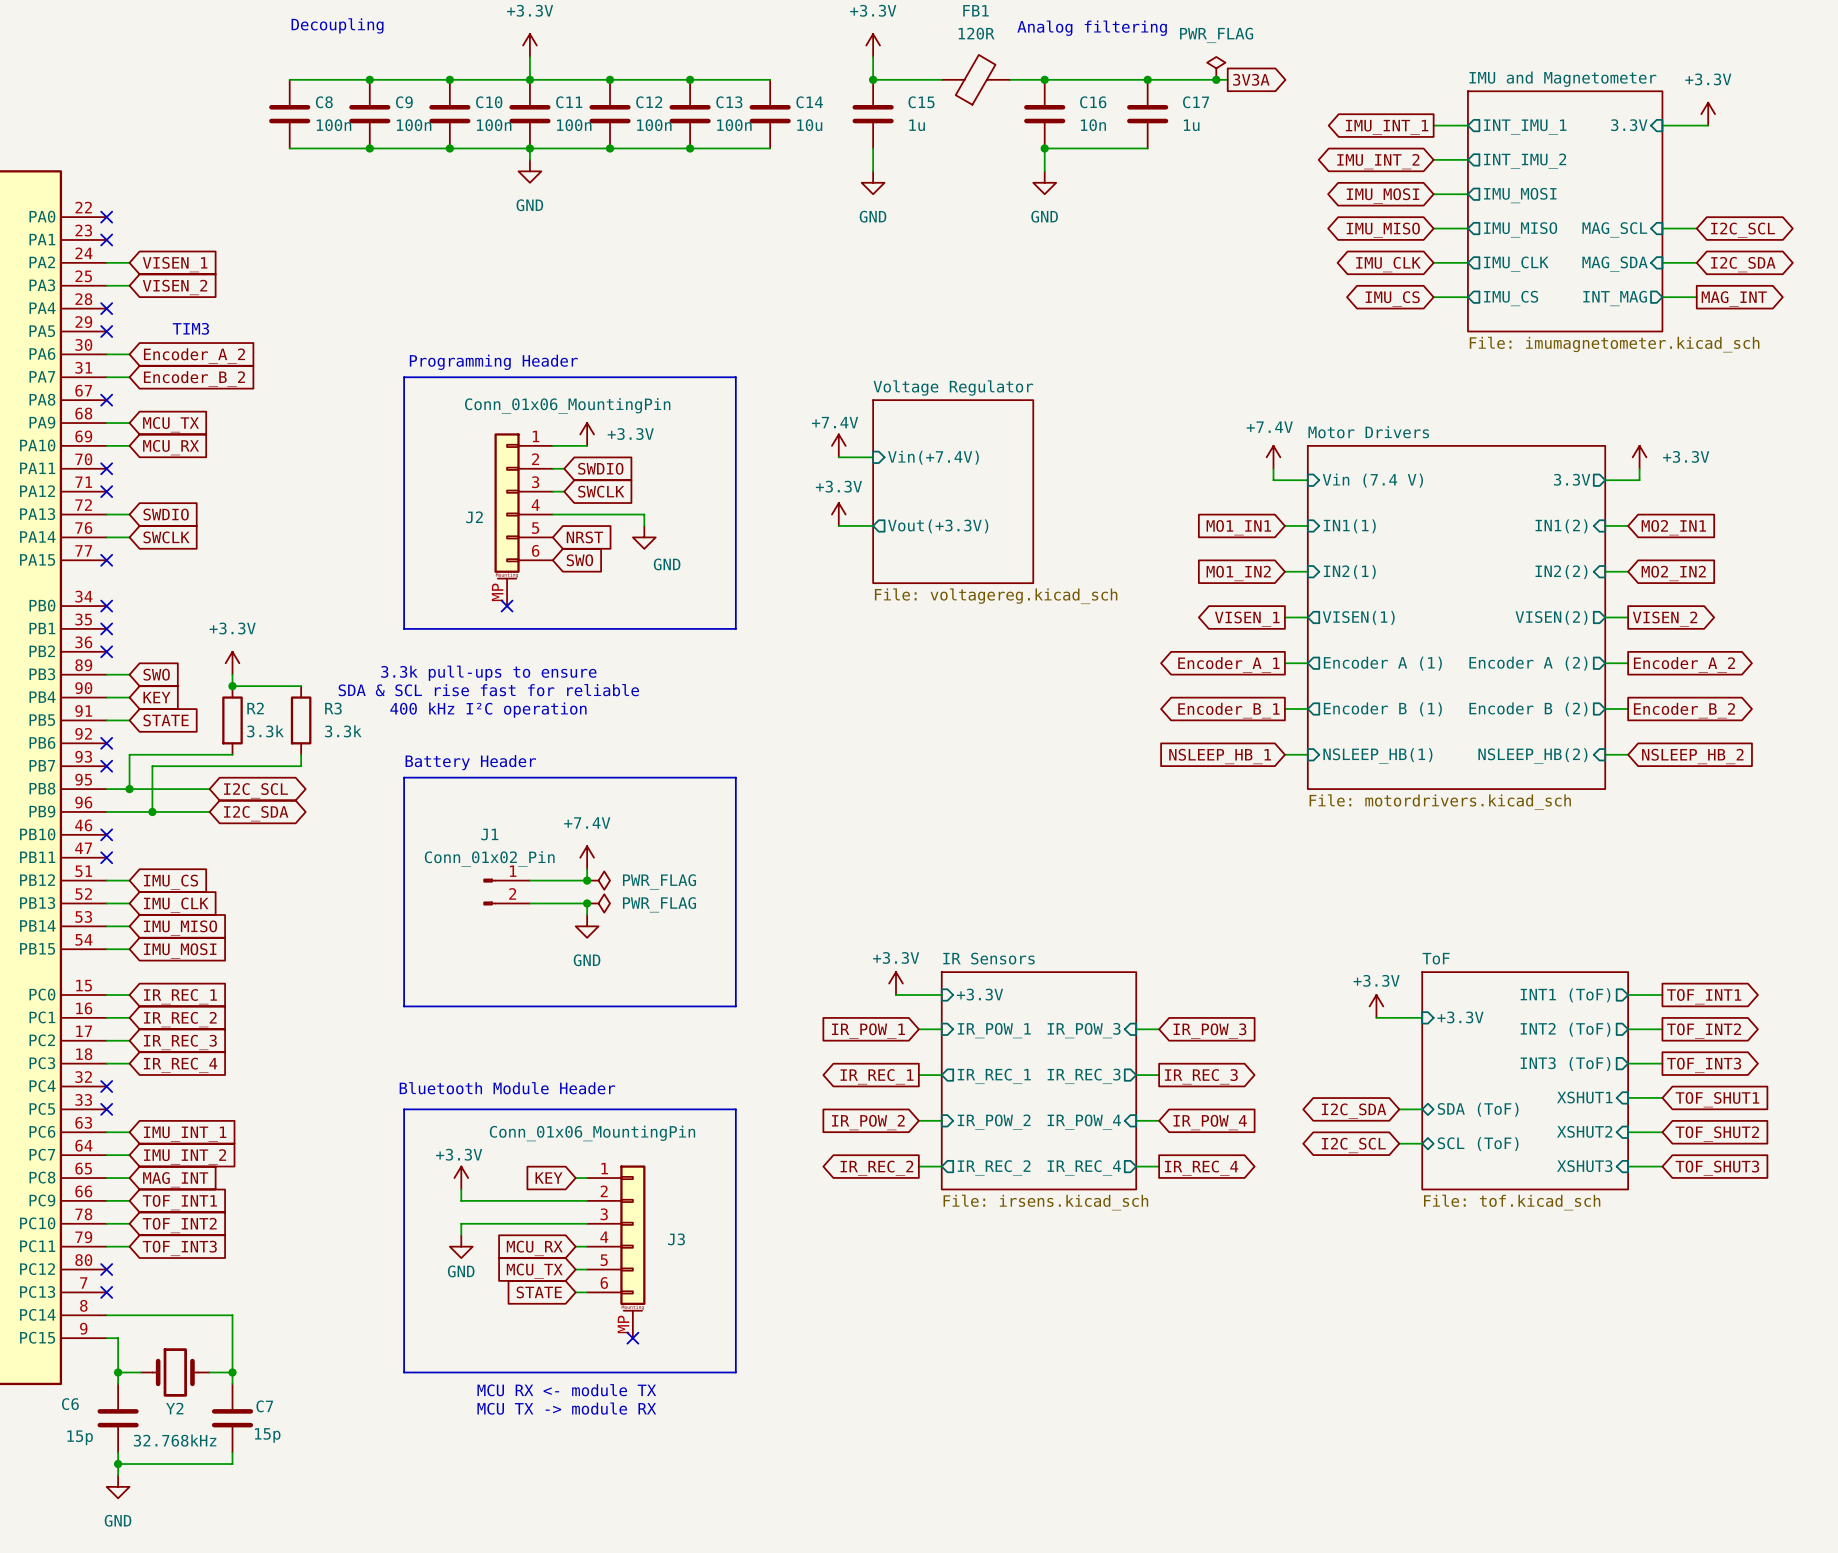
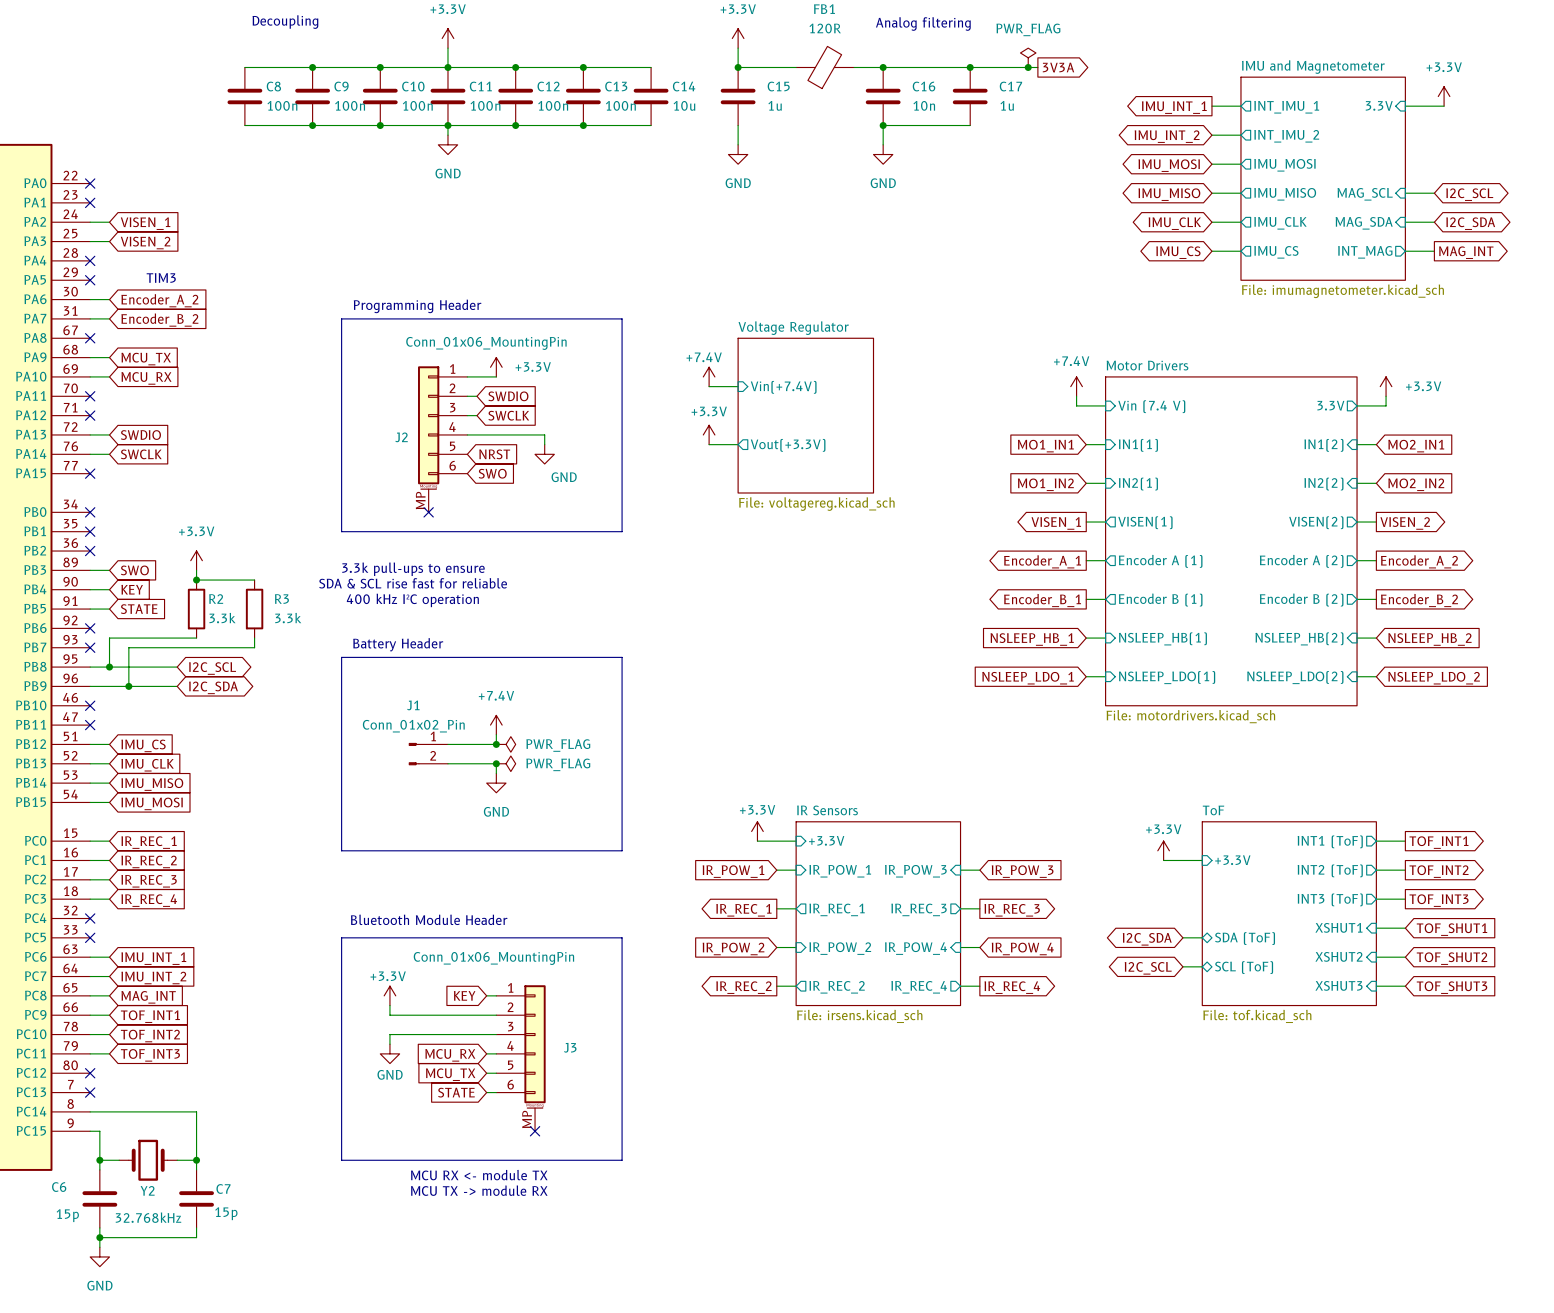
sheet Motor Drivers: File: motordrivers.kicad_sch (1456, 617) -> none
sheet Motor Drivers: none -> File: motordrivers.kicad_sch (1231, 541)
wire: none -> (1086, 676) (1105, 676)
wire: none -> (1357, 676) (1376, 676)
sheet pin: none -> NSLEEP_LDO(1) (1167, 677)
sheet pin: none -> NSLEEP_LDO(2) (1295, 677)
global label: none -> NSLEEP_LDO_1 (1028, 678)
global label: none -> NSLEEP_LDO_2 (1434, 678)

